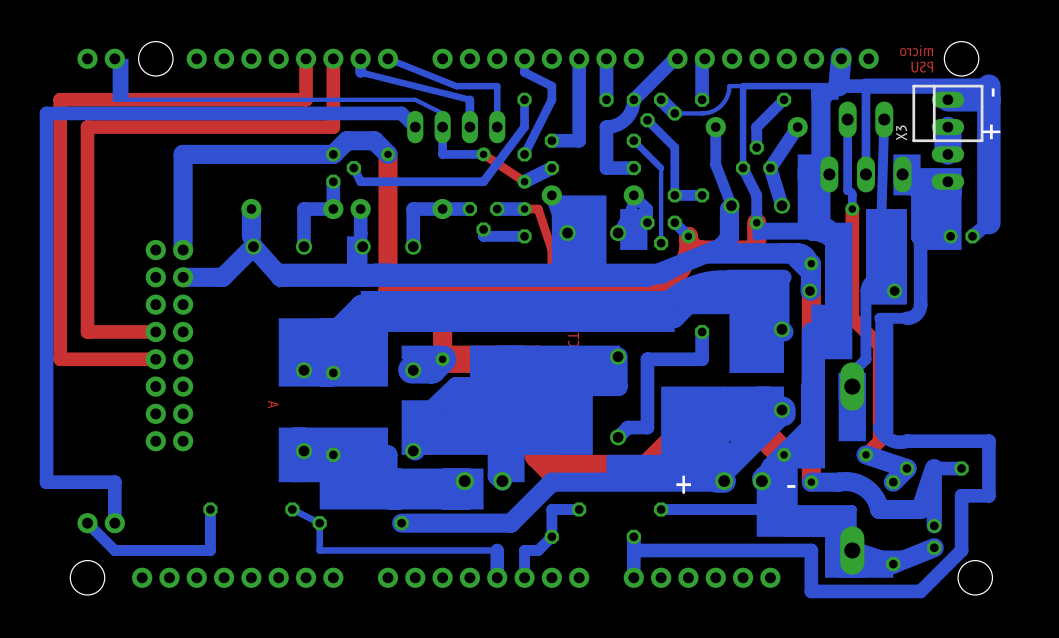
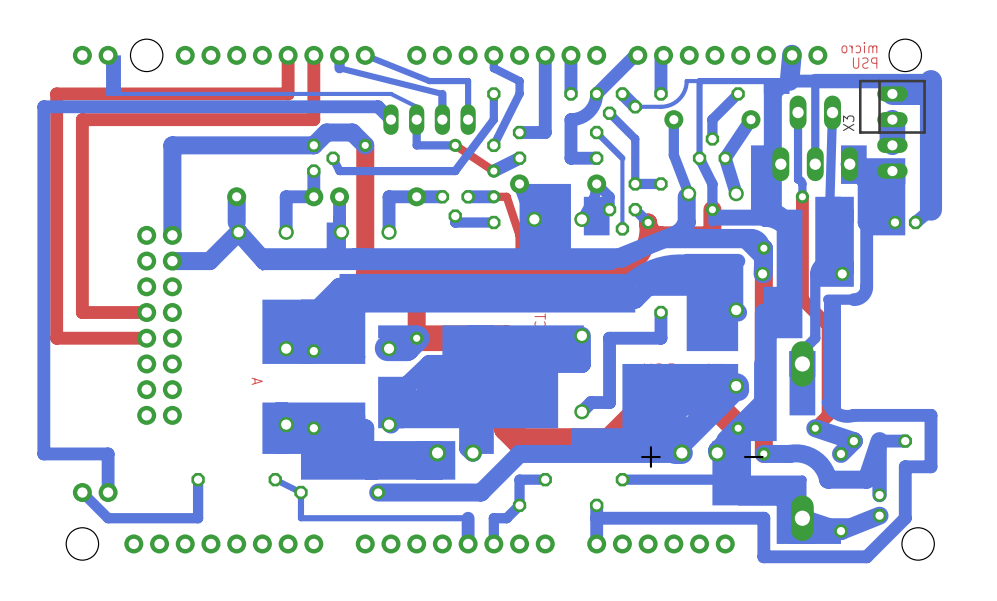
text: - (993, 92) -> none
text: + (991, 131) -> none

